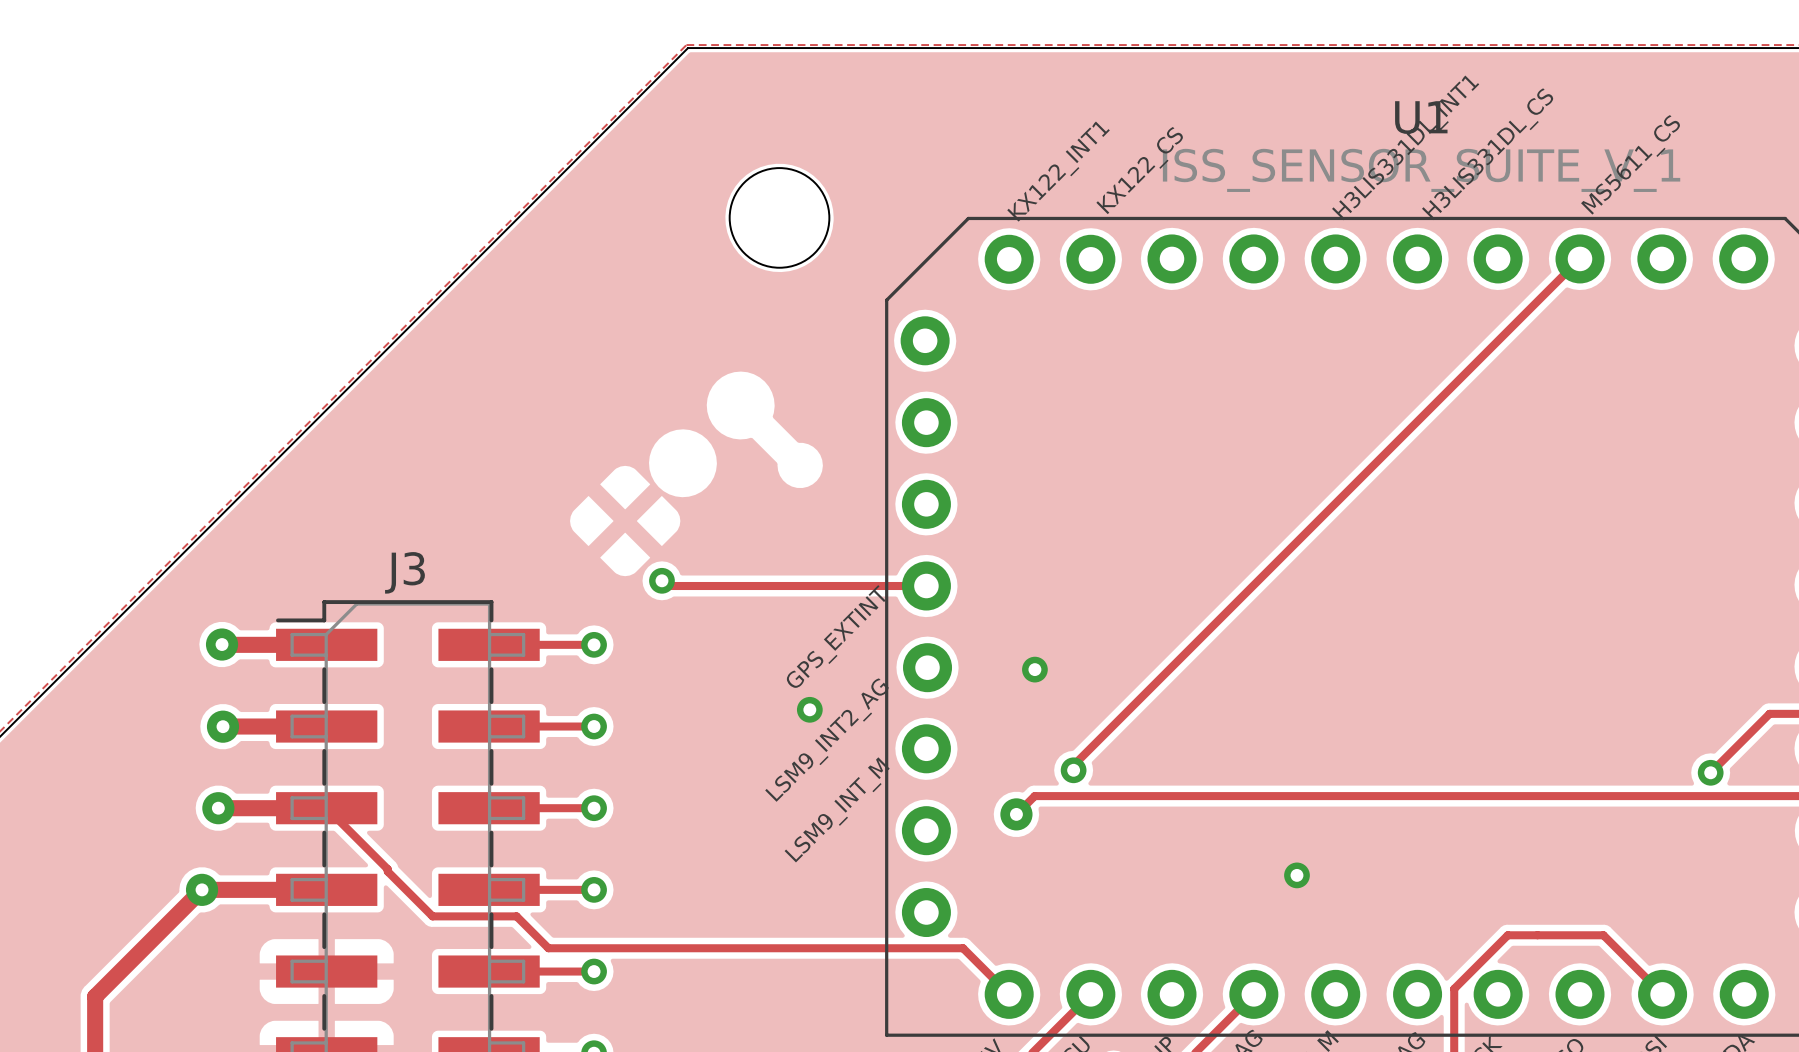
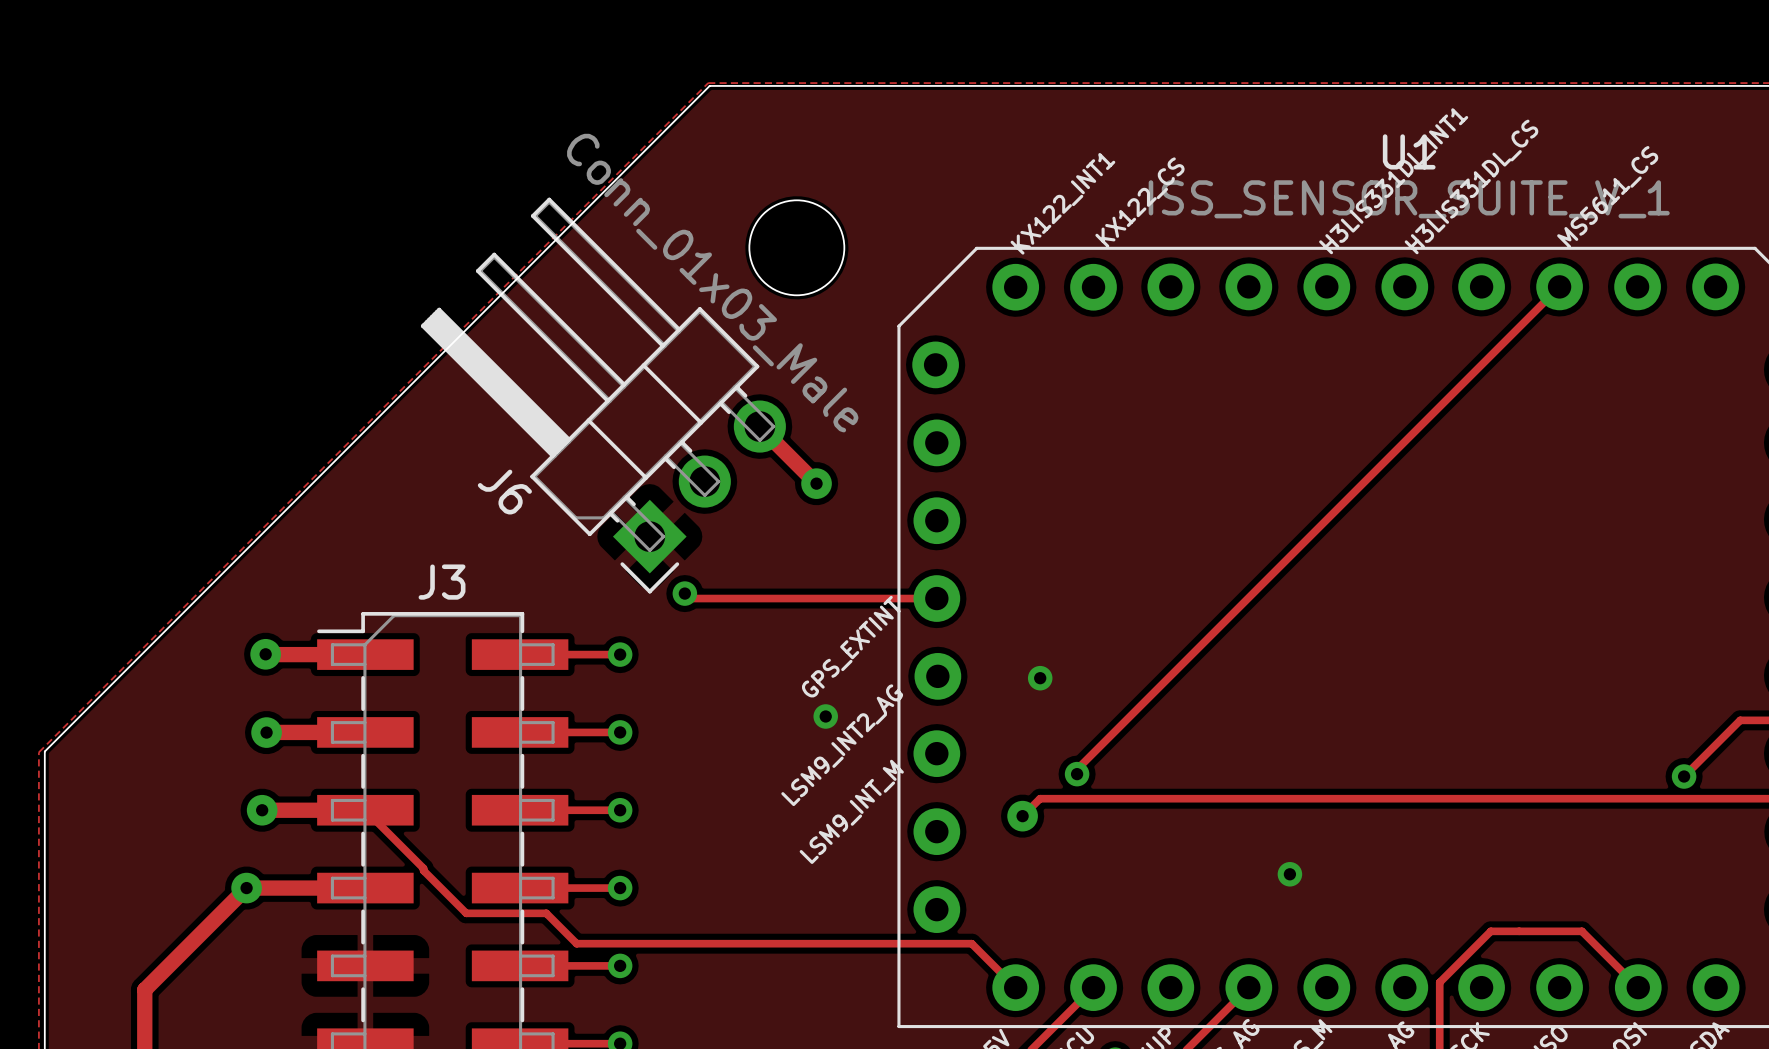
J6: none -> Conn_01x03_Male (603, 395)
track: none -> (759, 426) (816, 483)
via: none -> (816, 483)

